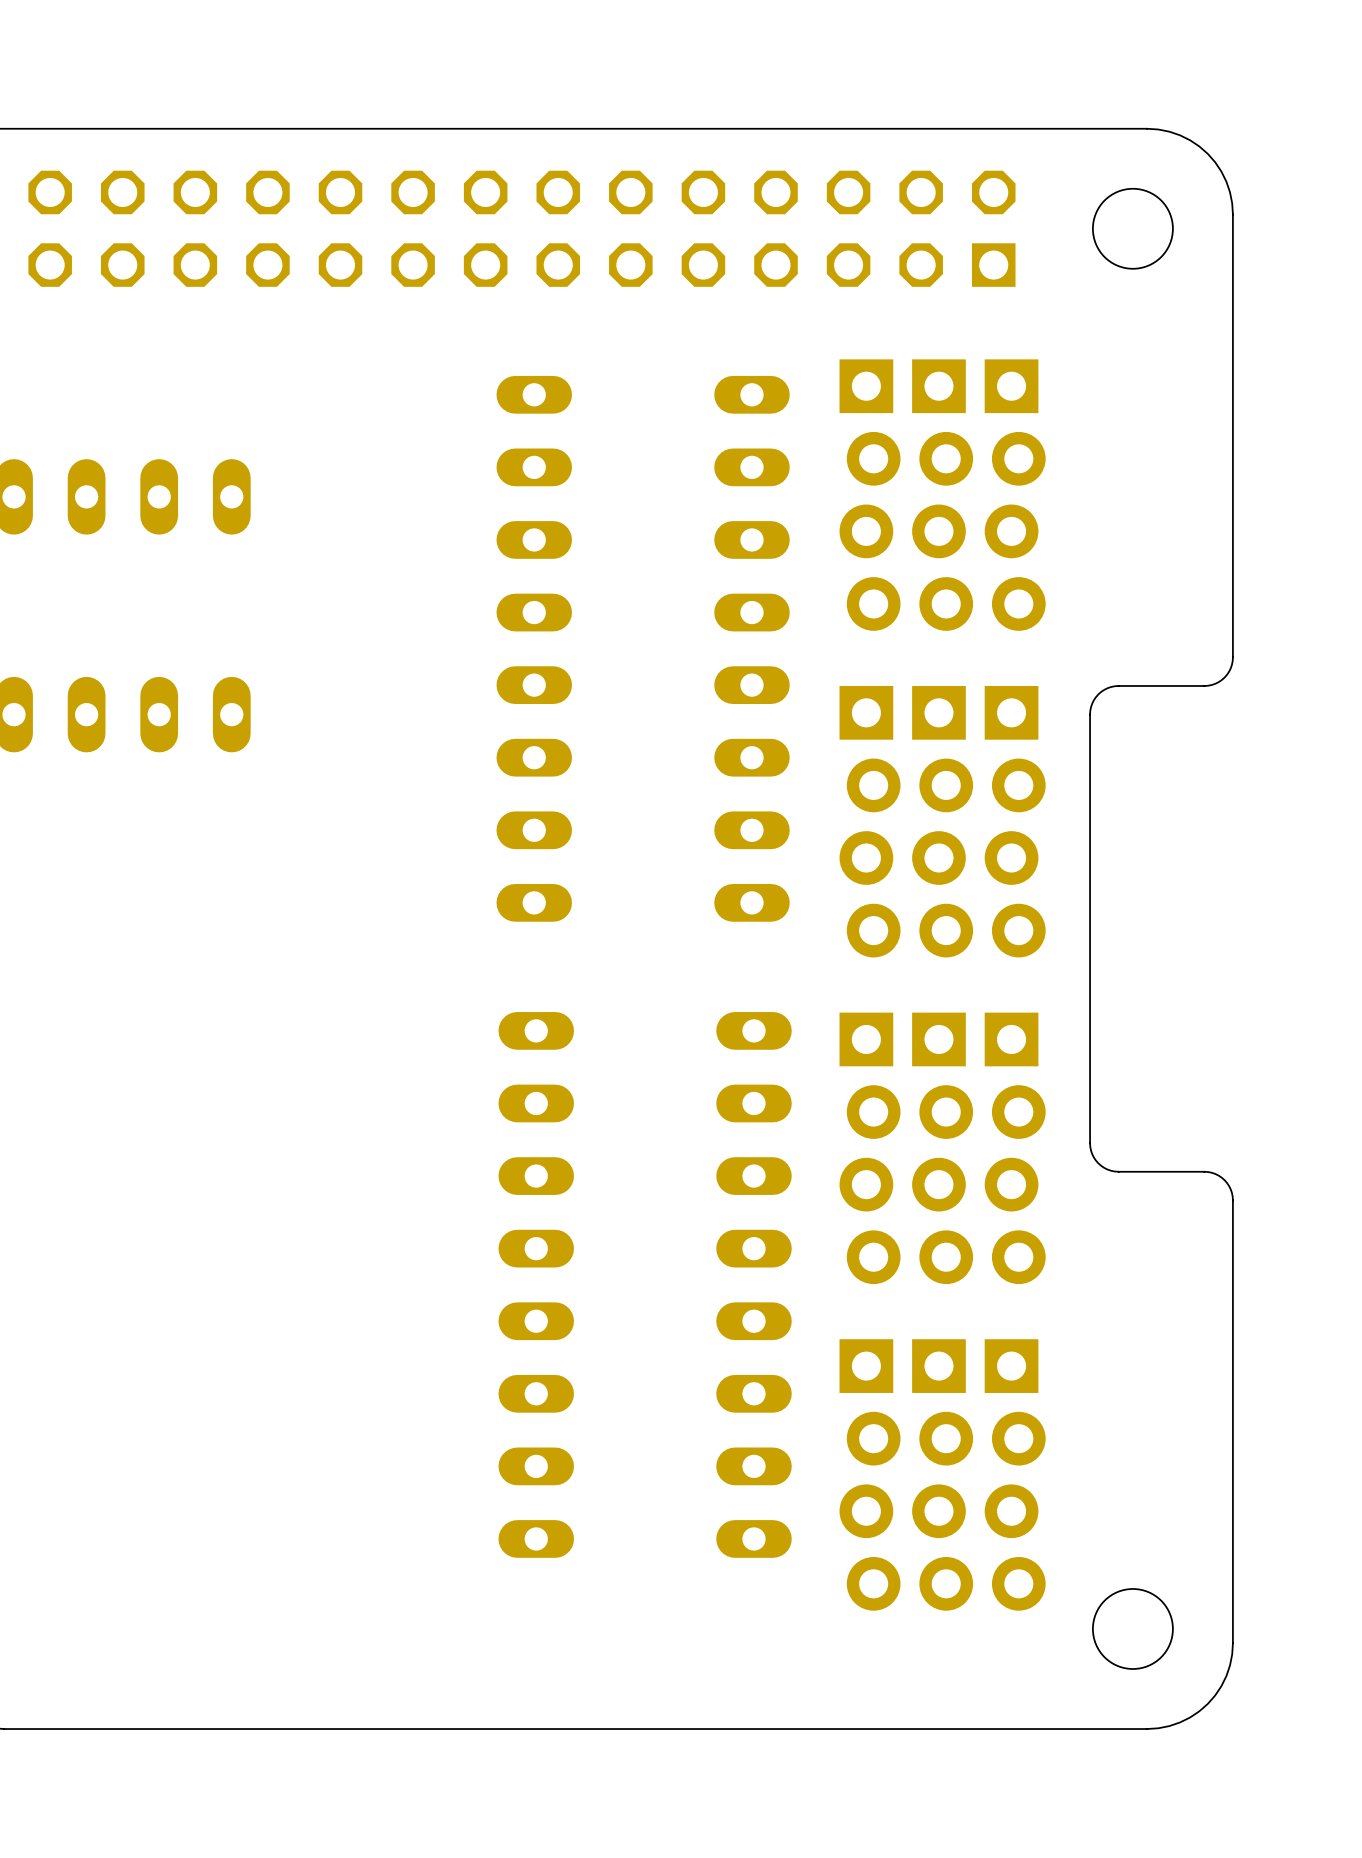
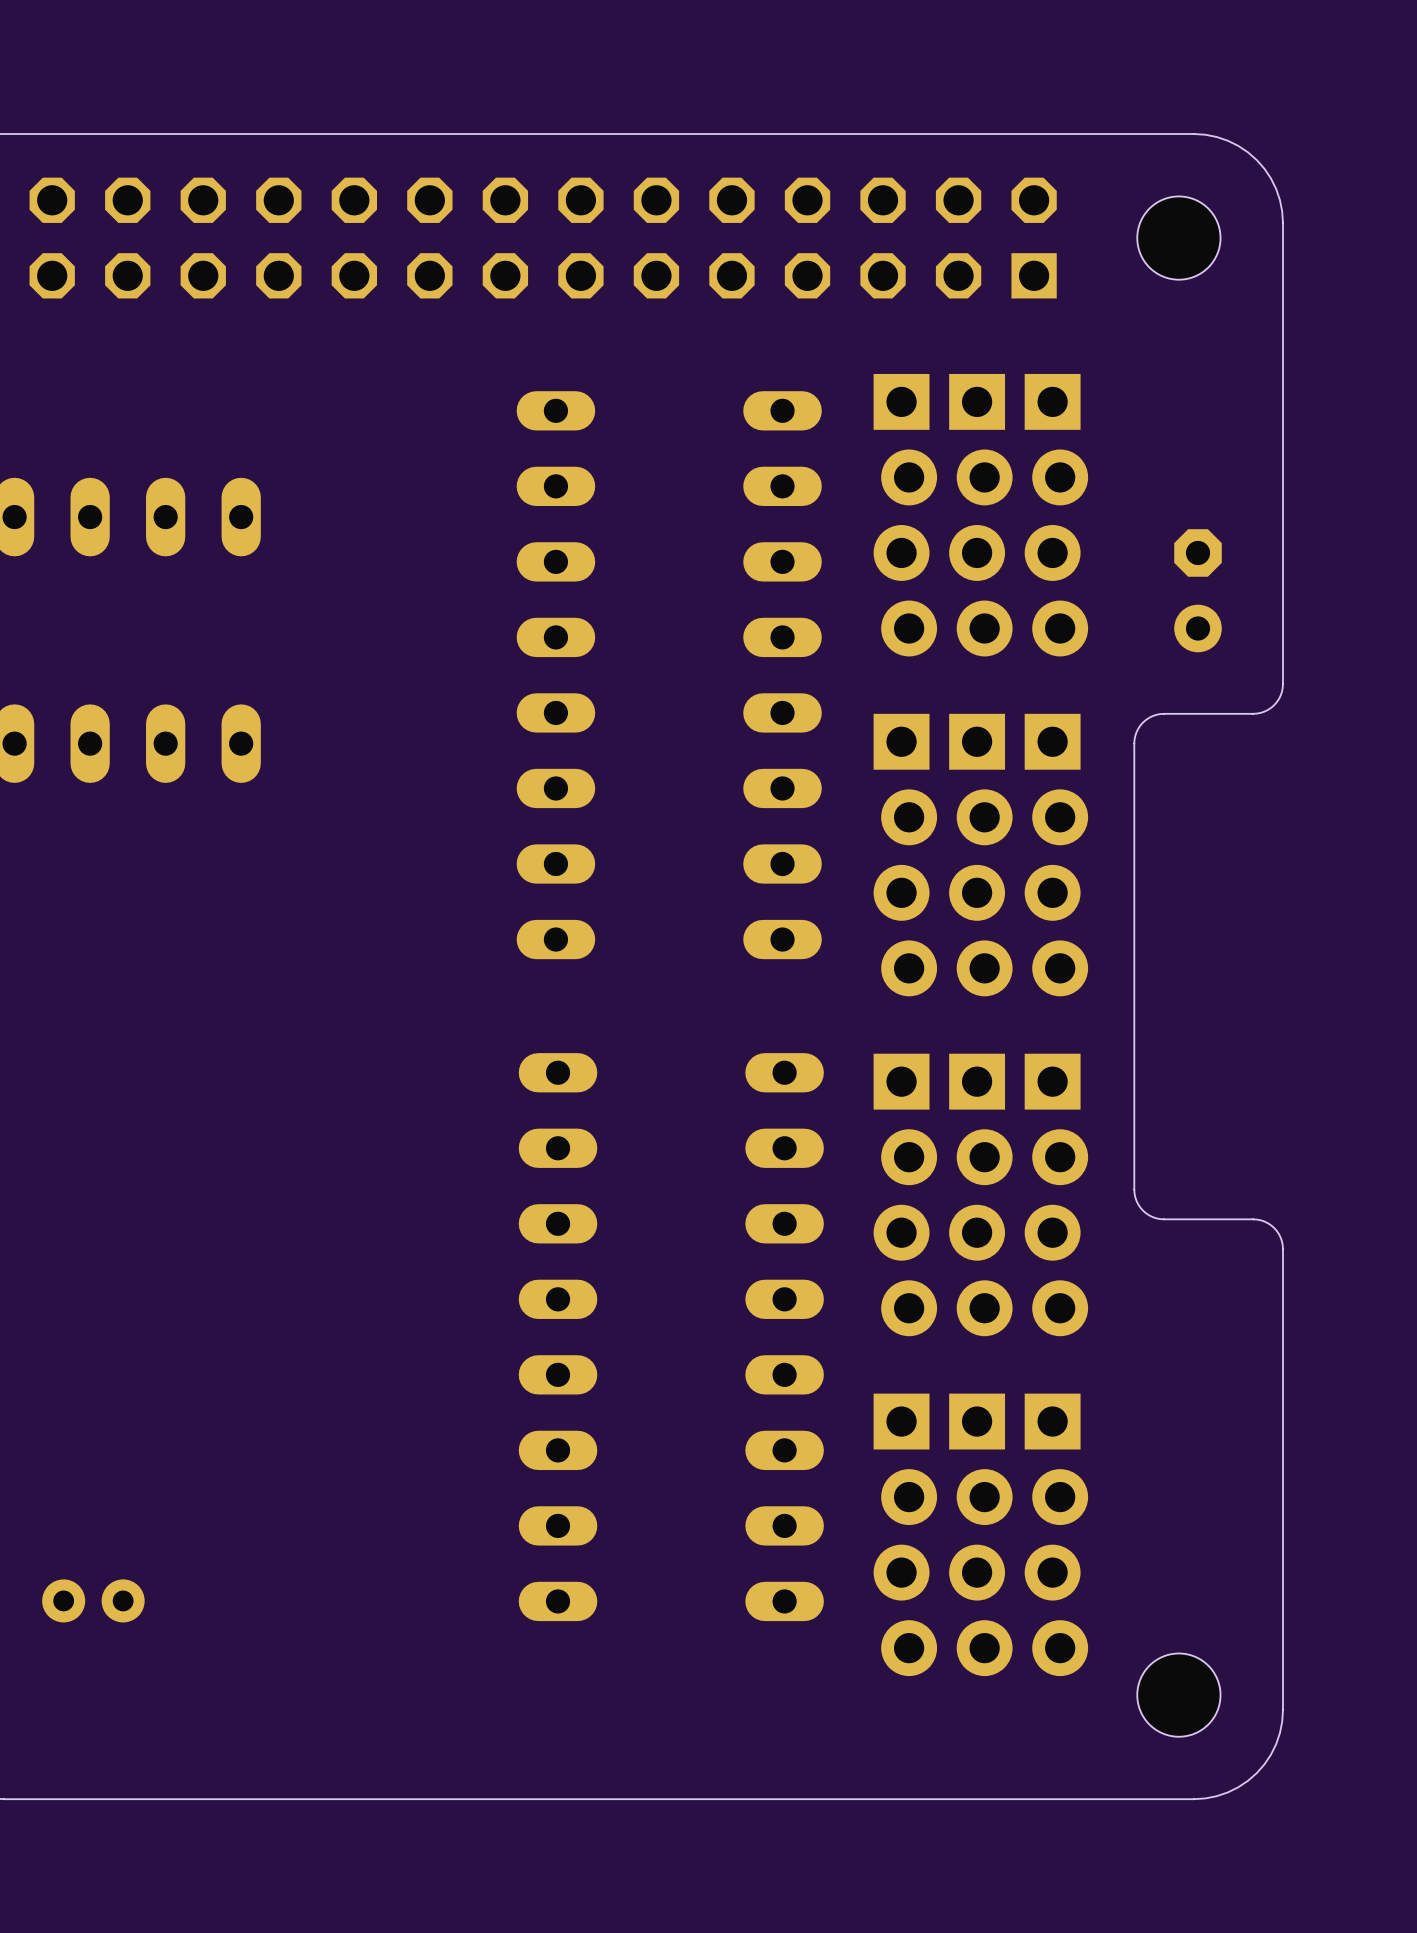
part: none -> (1198, 590)
part: none -> (93, 1600)

